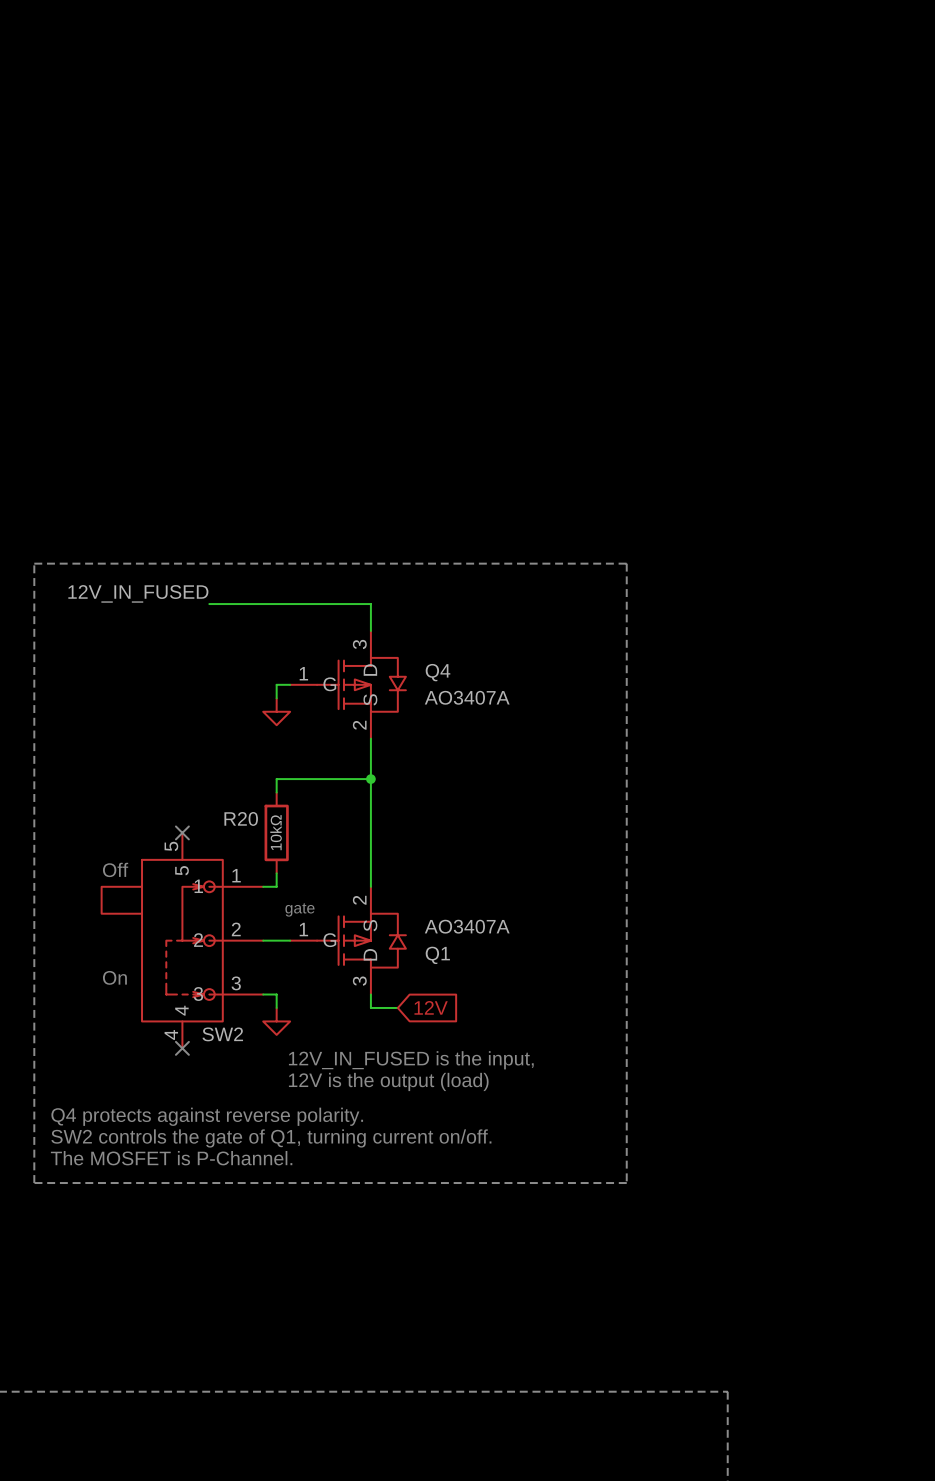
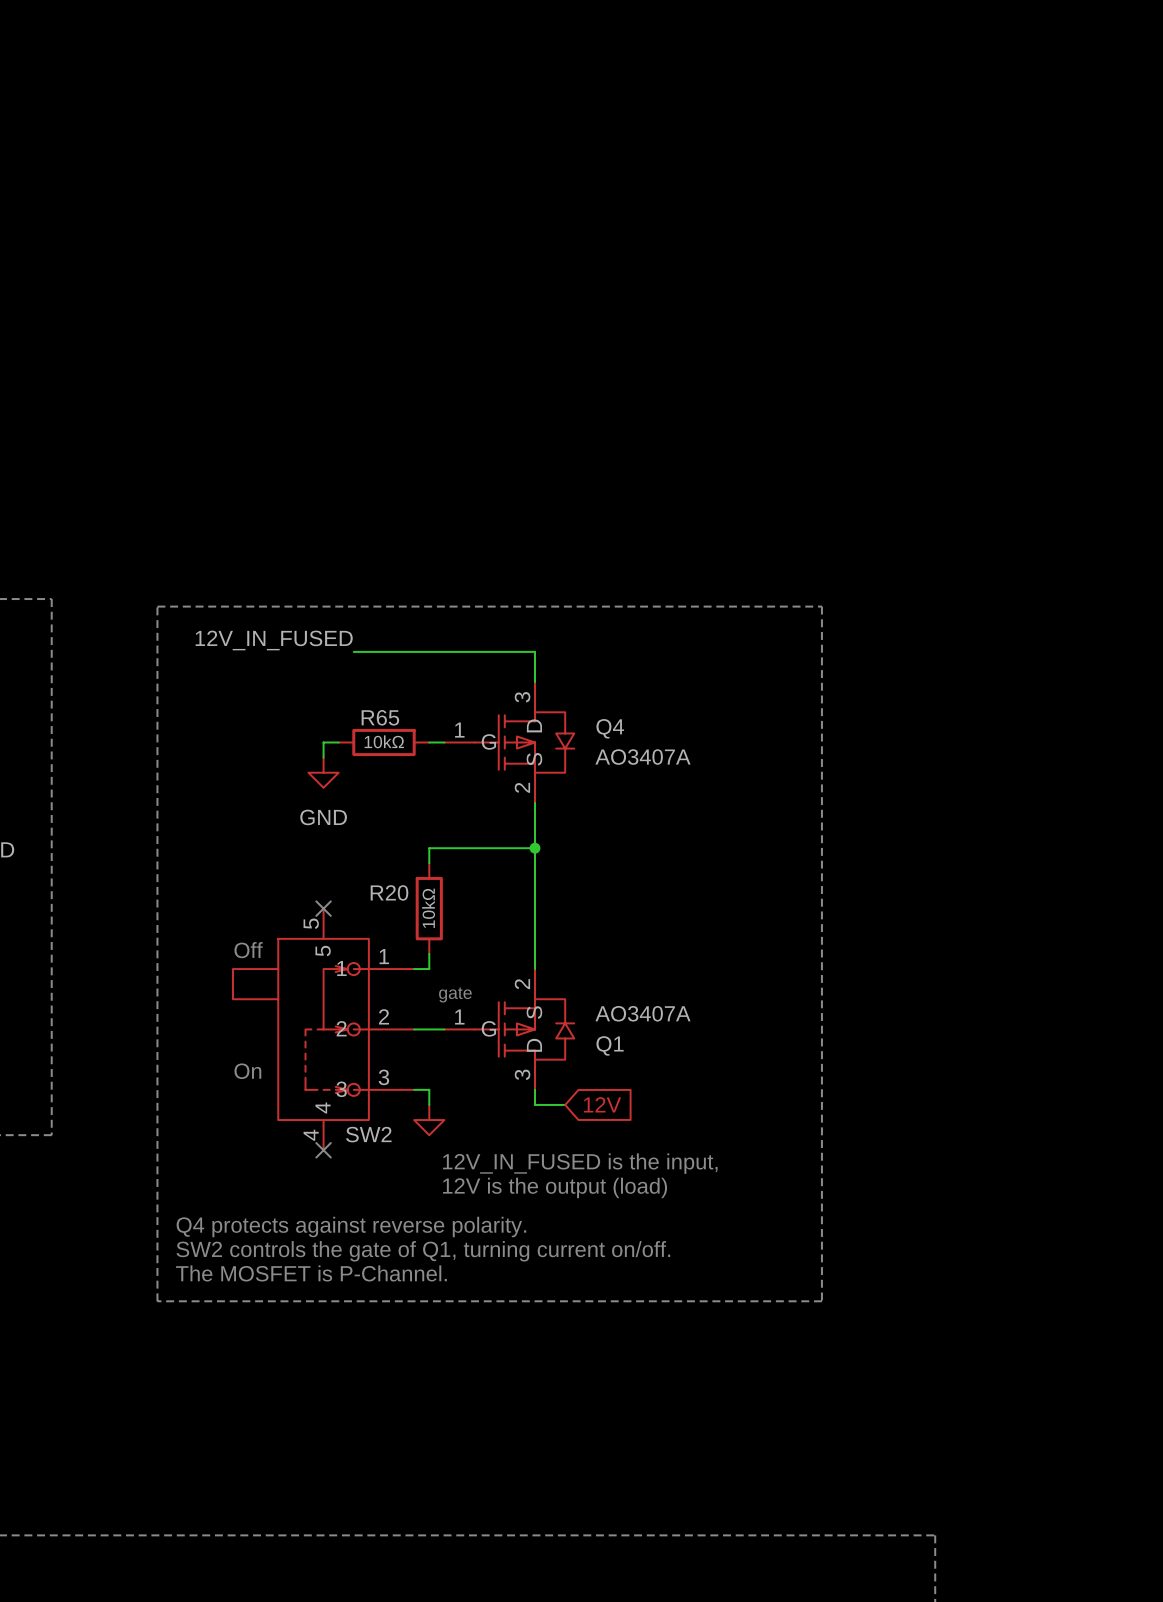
wire: none -> (338, 742) (323, 742) (323, 757)
R65: none -> 10kΩ (383, 742)
wire: (276, 684) (276, 698) -> none
power symbol: none -> GND (323, 772)
power symbol: (276, 711) -> none

